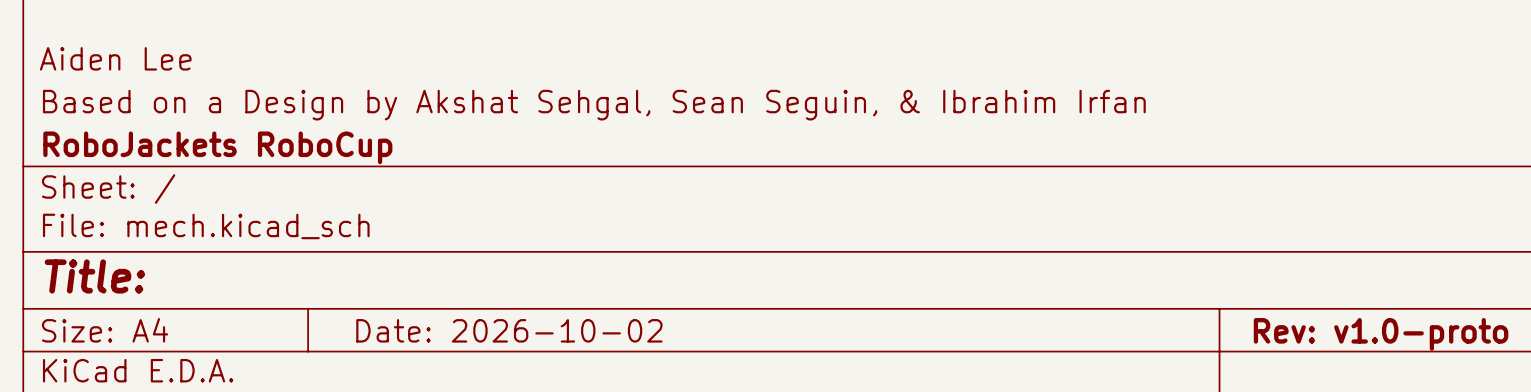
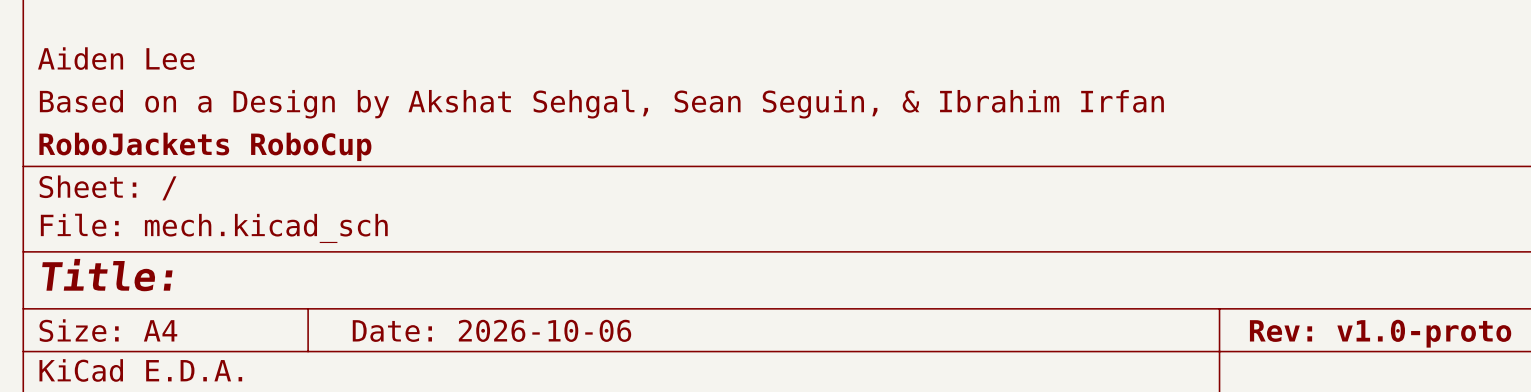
title block: Date: 2026-10-02 (509, 330) -> Date: 2026-10-06 (491, 330)

